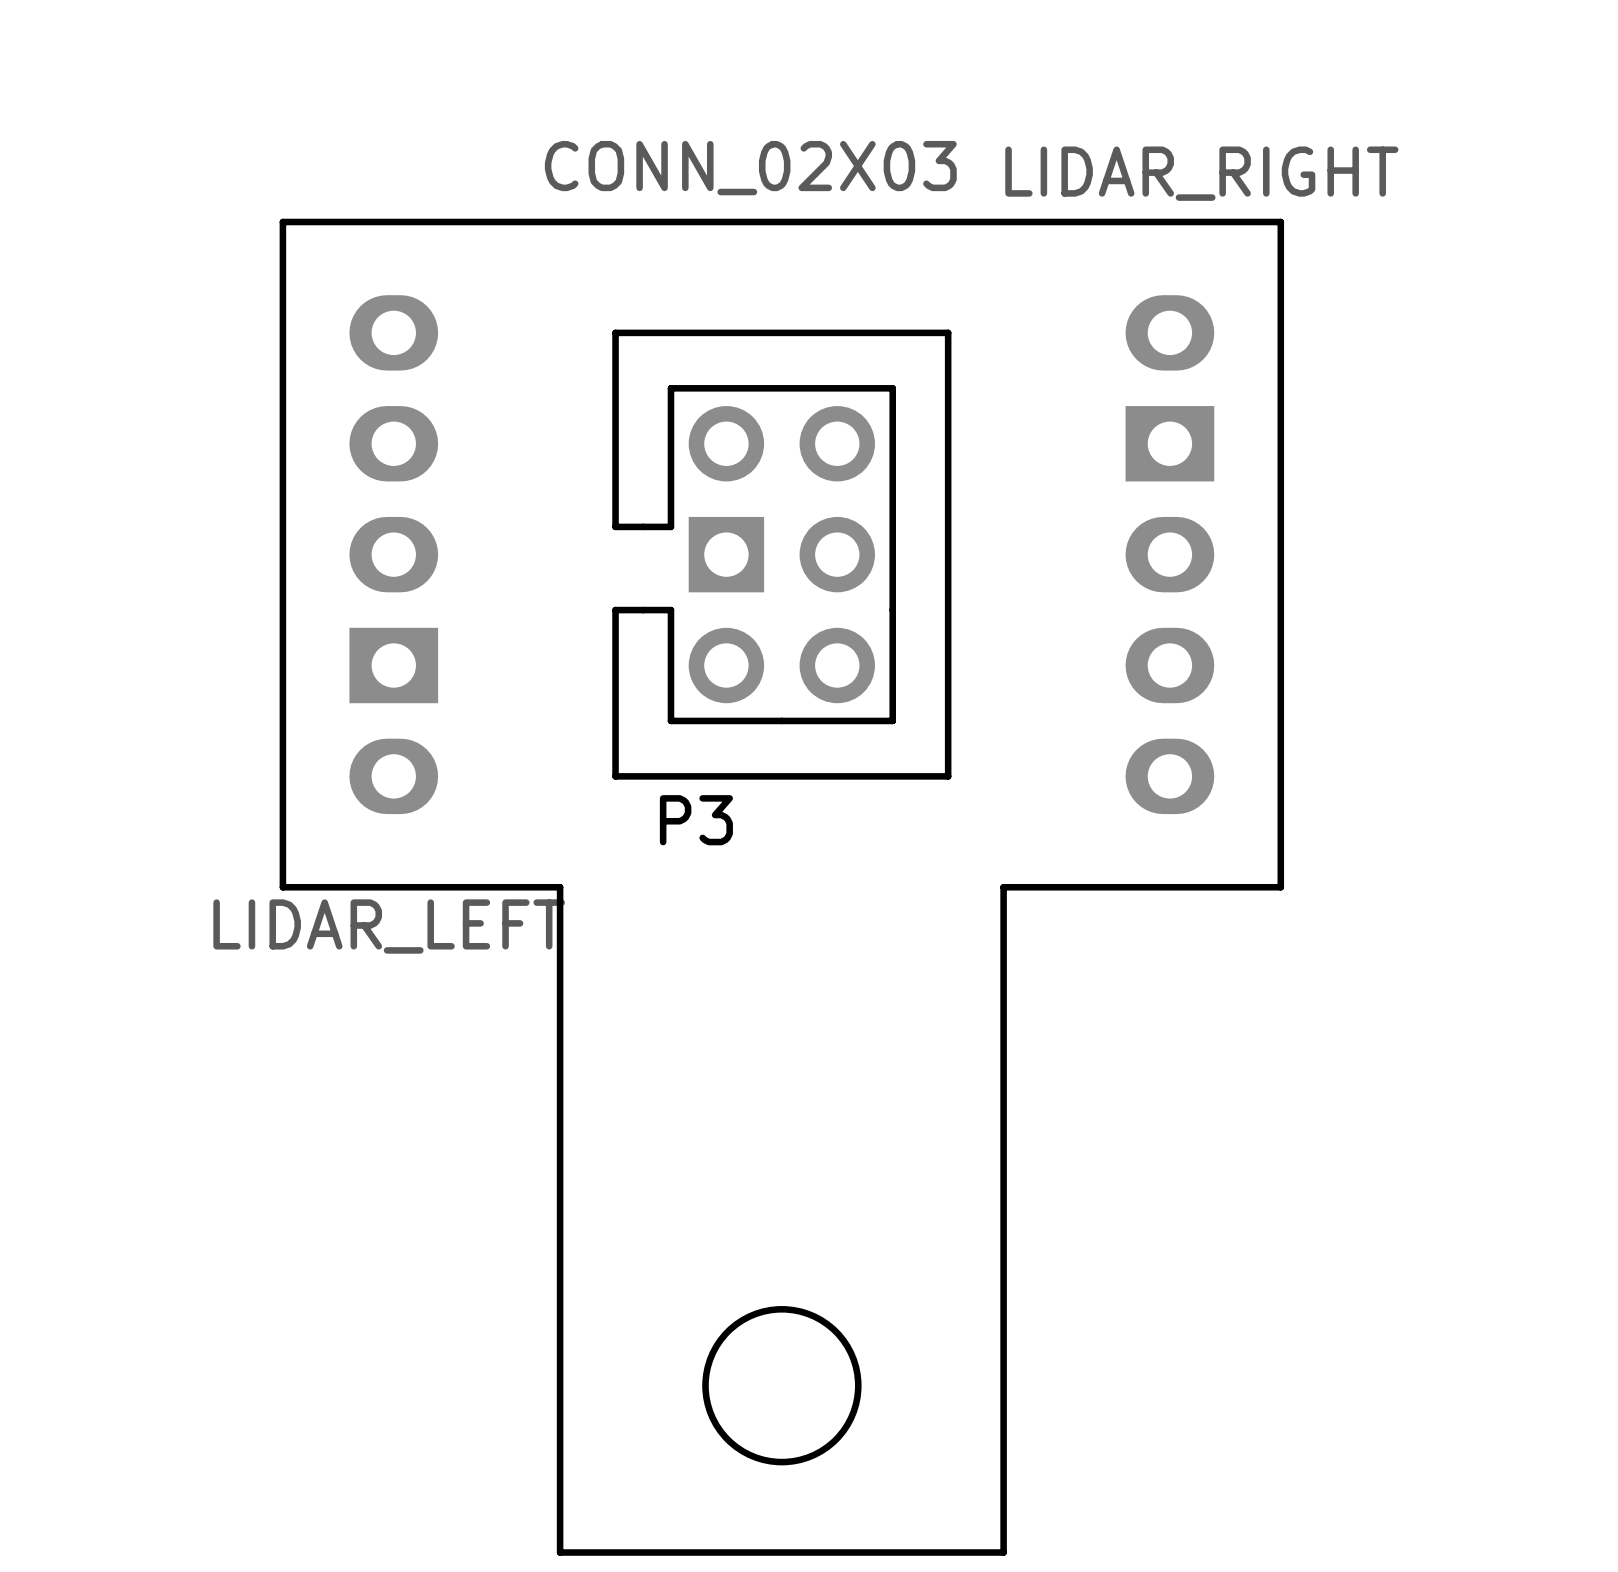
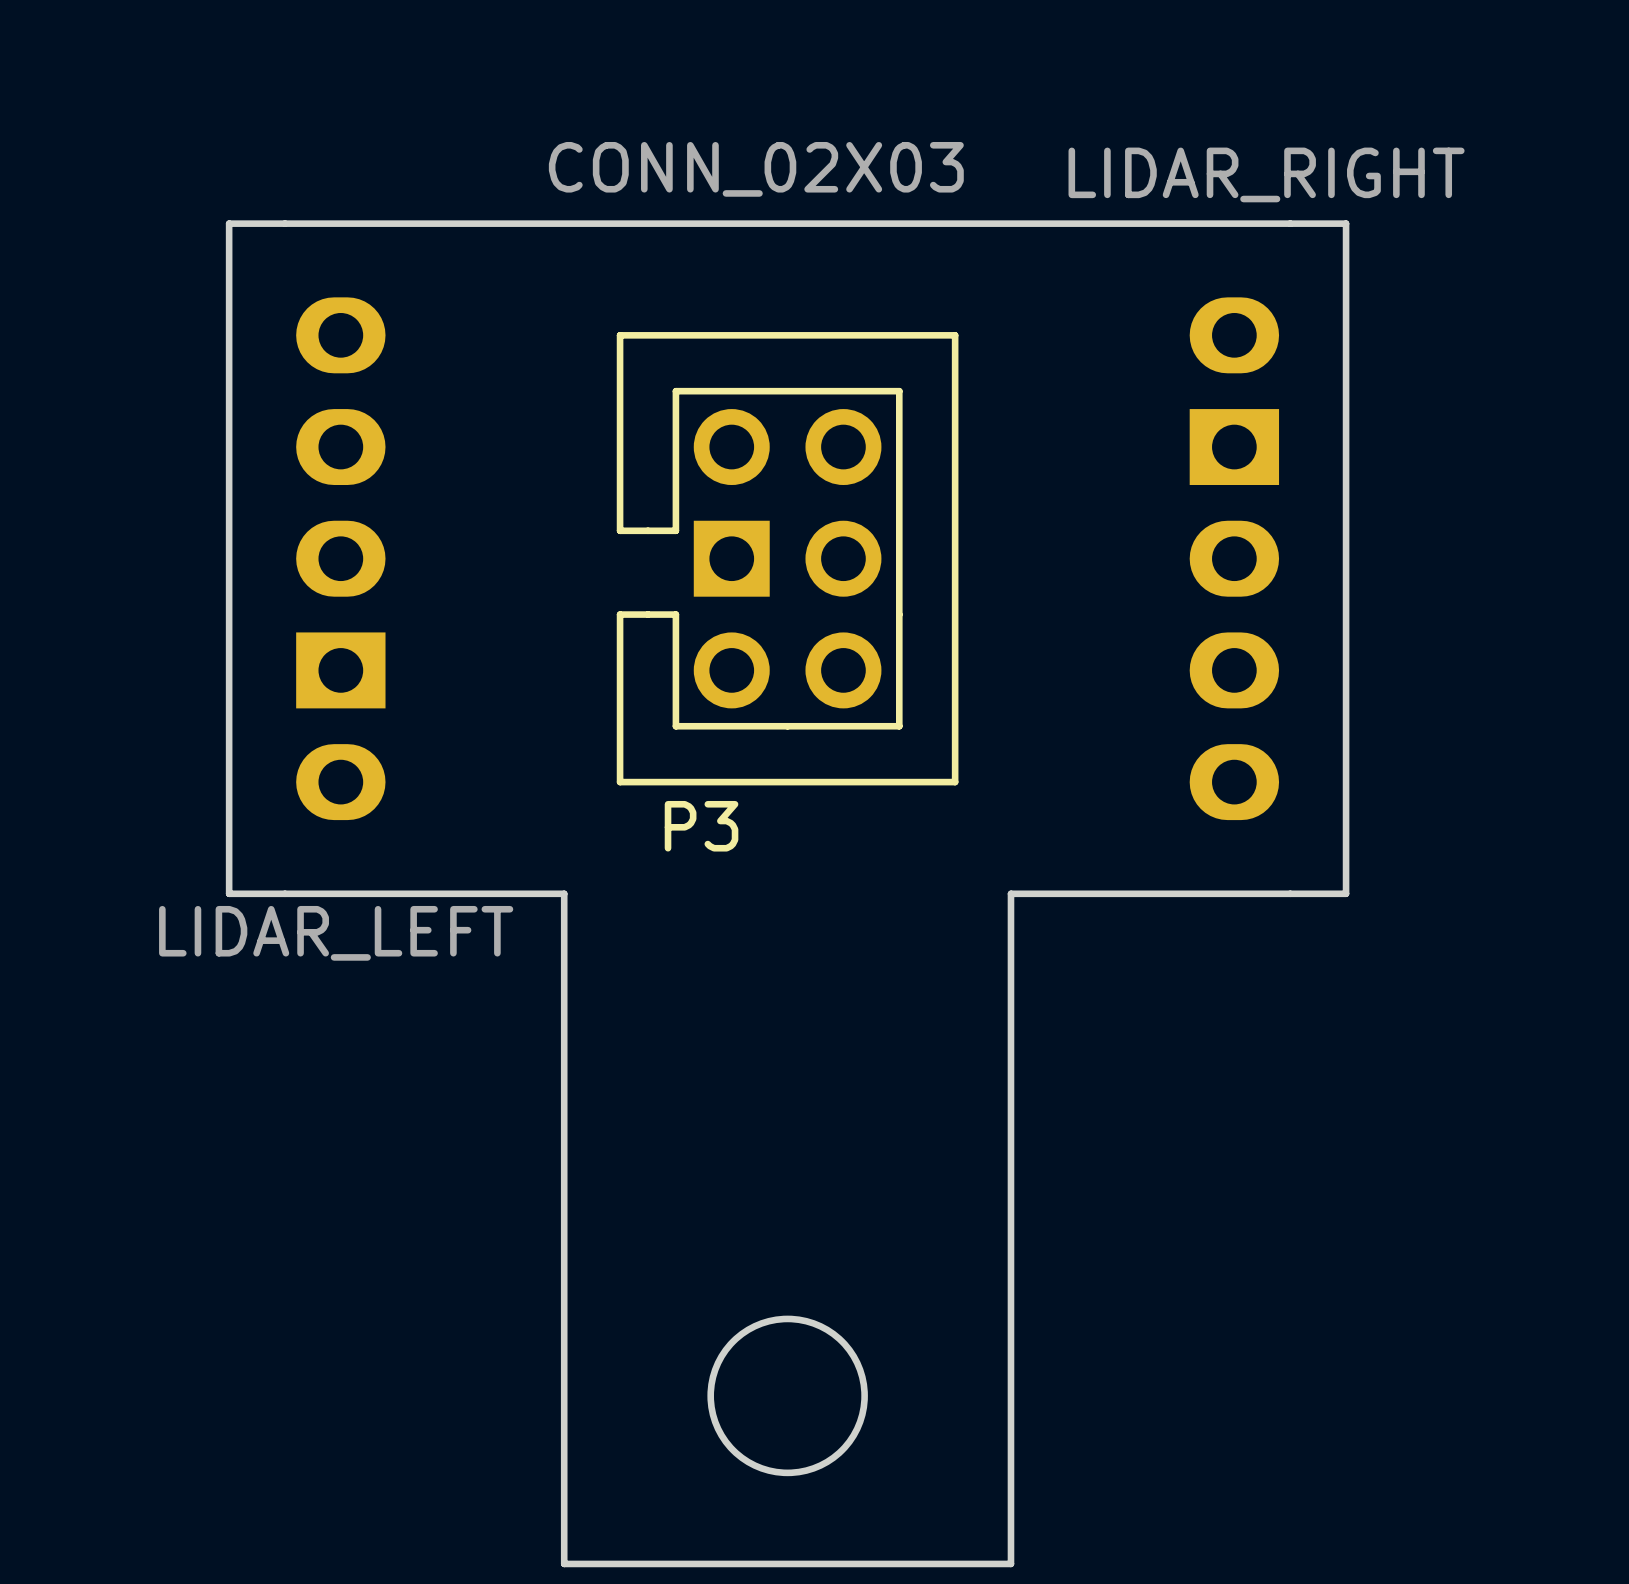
board edge: (282, 222) (282, 887) -> (284, 223) (229, 223) (229, 893) (284, 893)
board edge: (1280, 222) (1280, 887) -> (1290, 223) (1346, 223) (1346, 893) (1290, 893)
part position: (393, 554) -> (340, 558)
part position: (1169, 554) -> (1234, 558)

